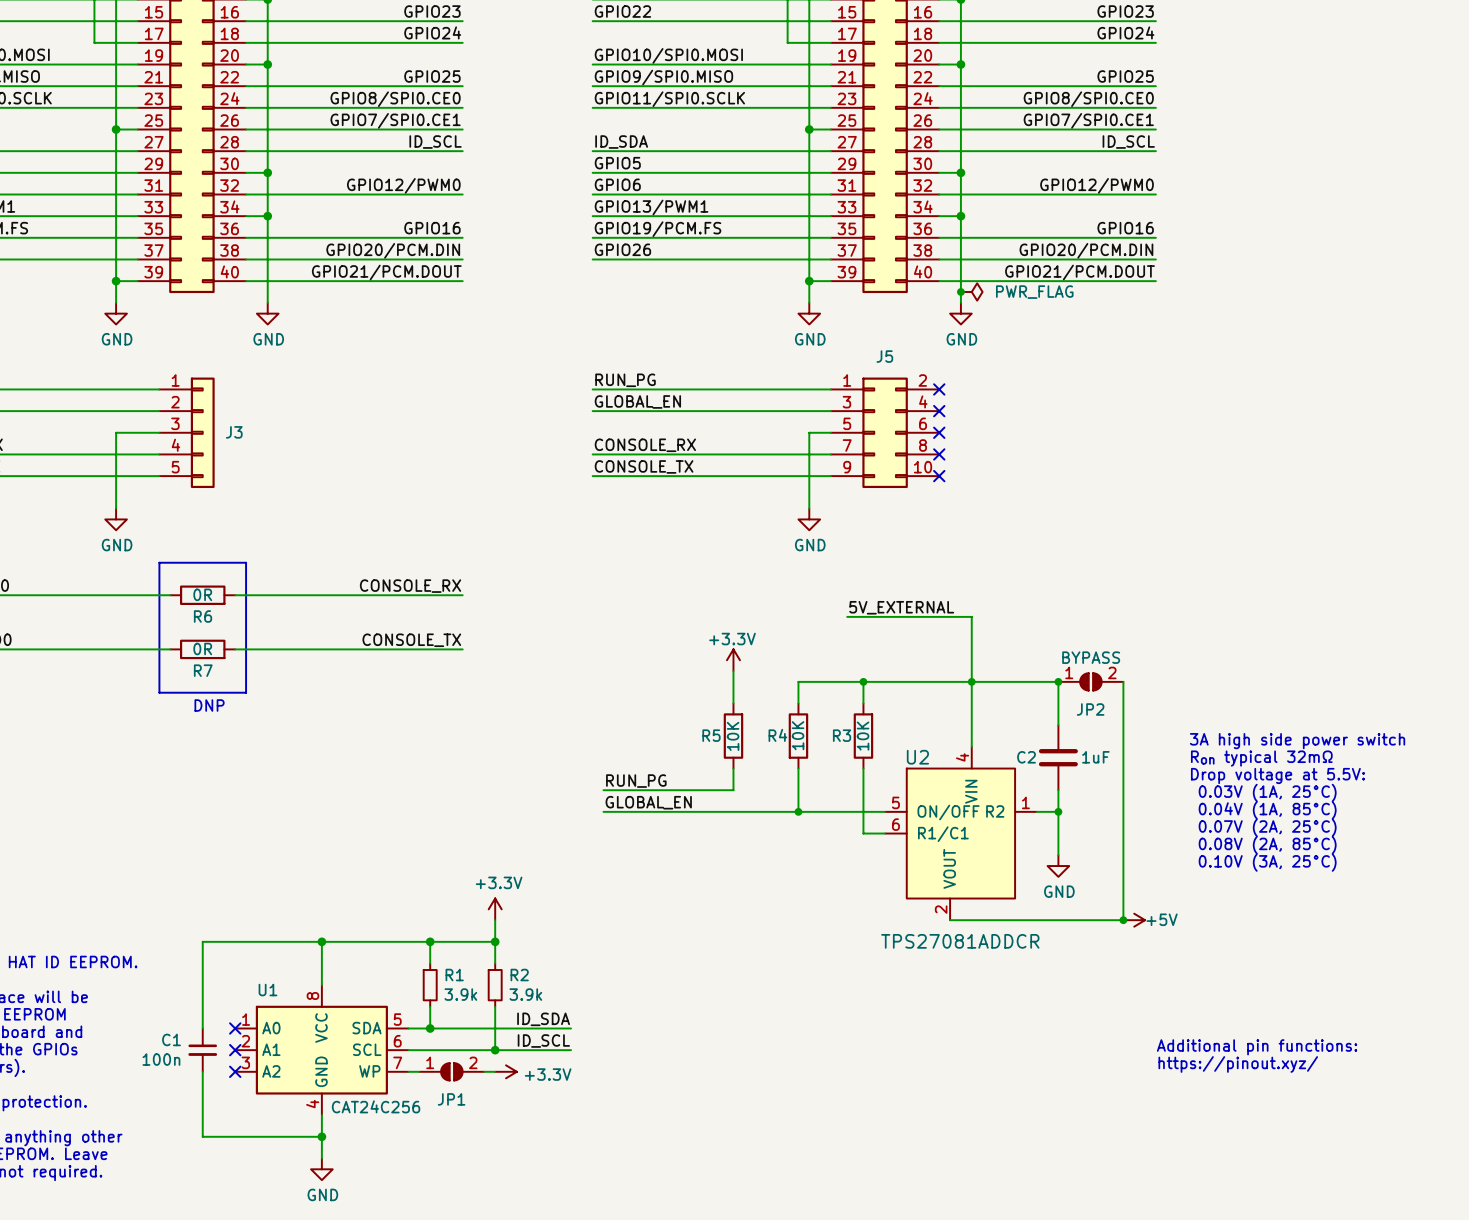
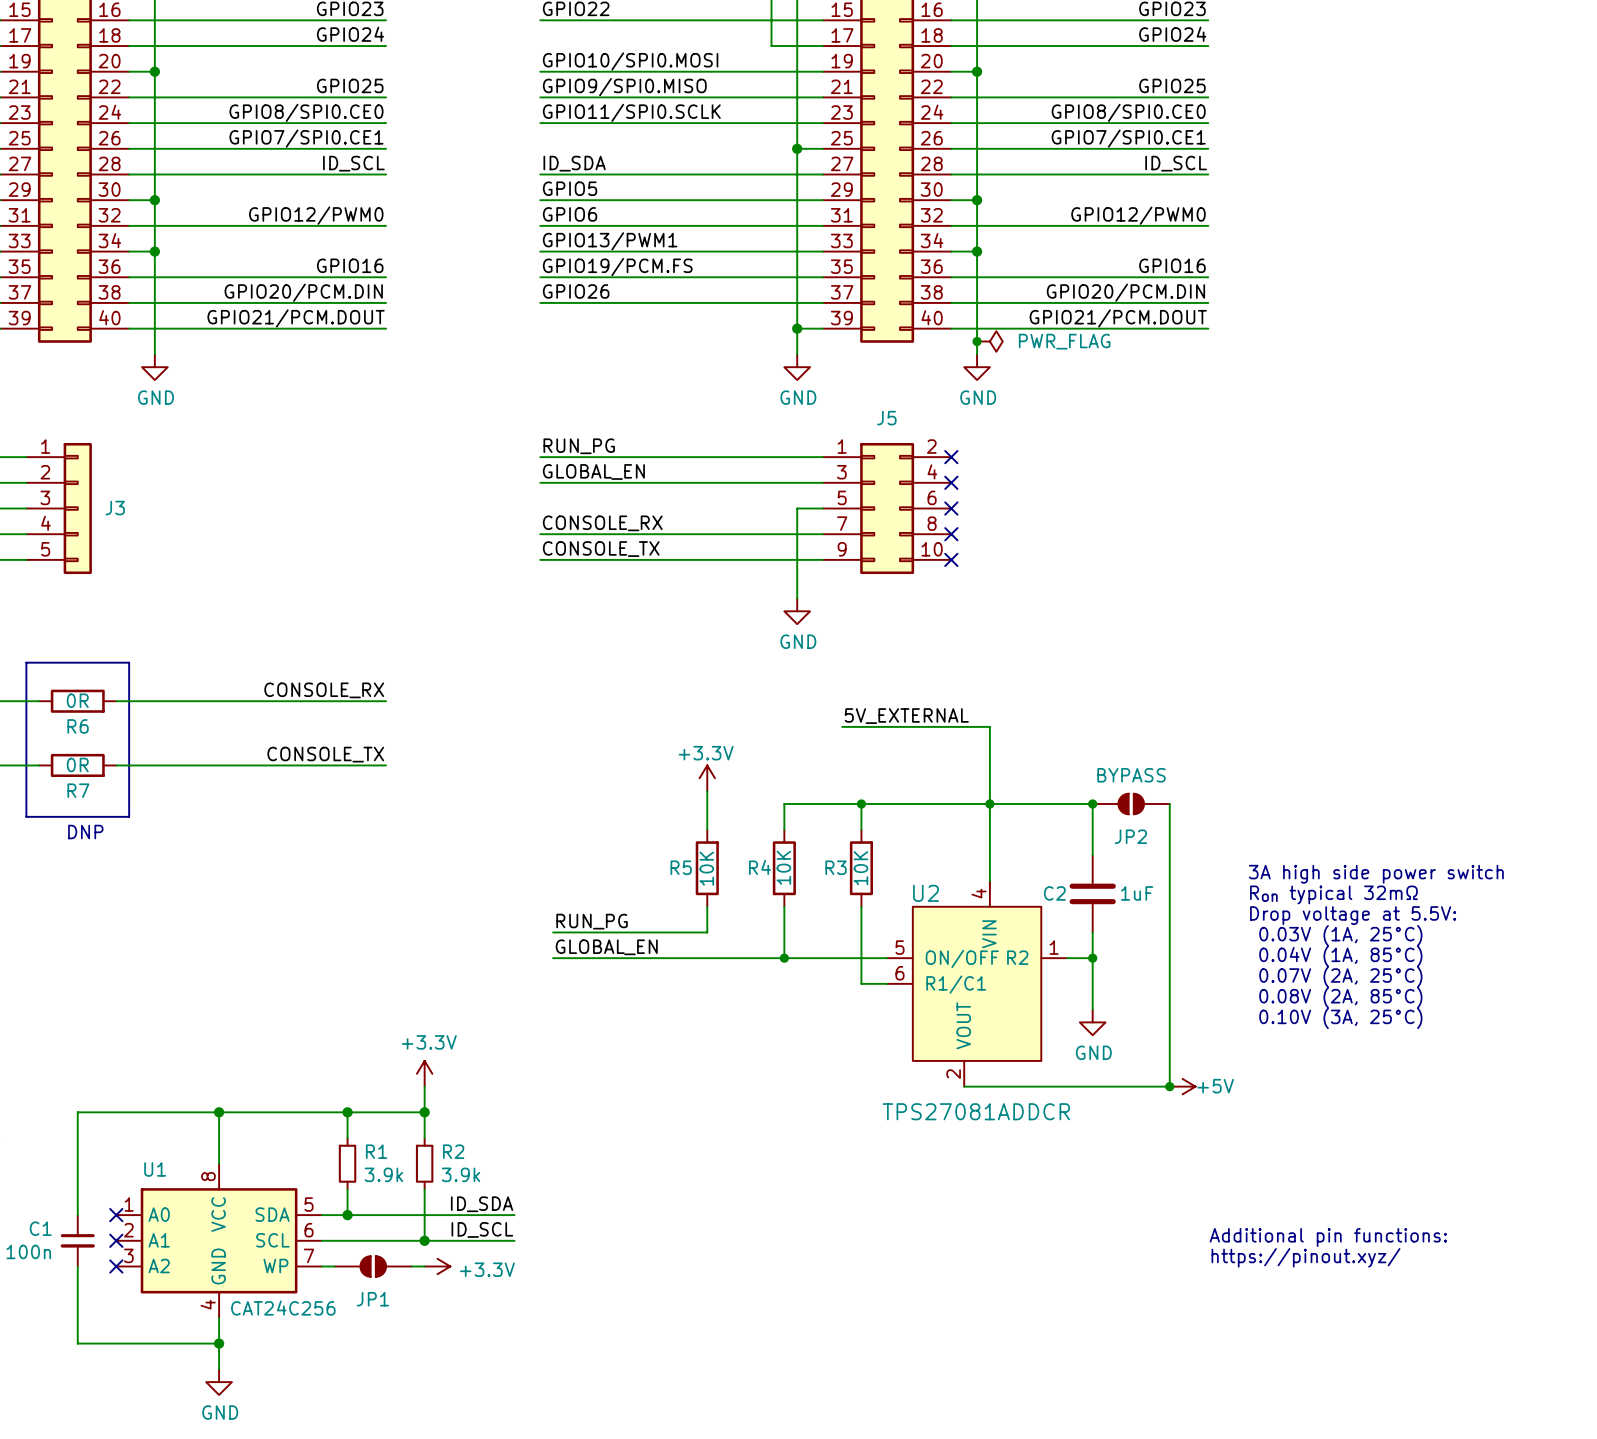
JP2 pin number: 1 (1069, 672) -> none
JP2 pin number: 2 (1112, 672) -> none
JP1 pin number: 1 (430, 1062) -> none
JP1 pin number: 2 (473, 1062) -> none

